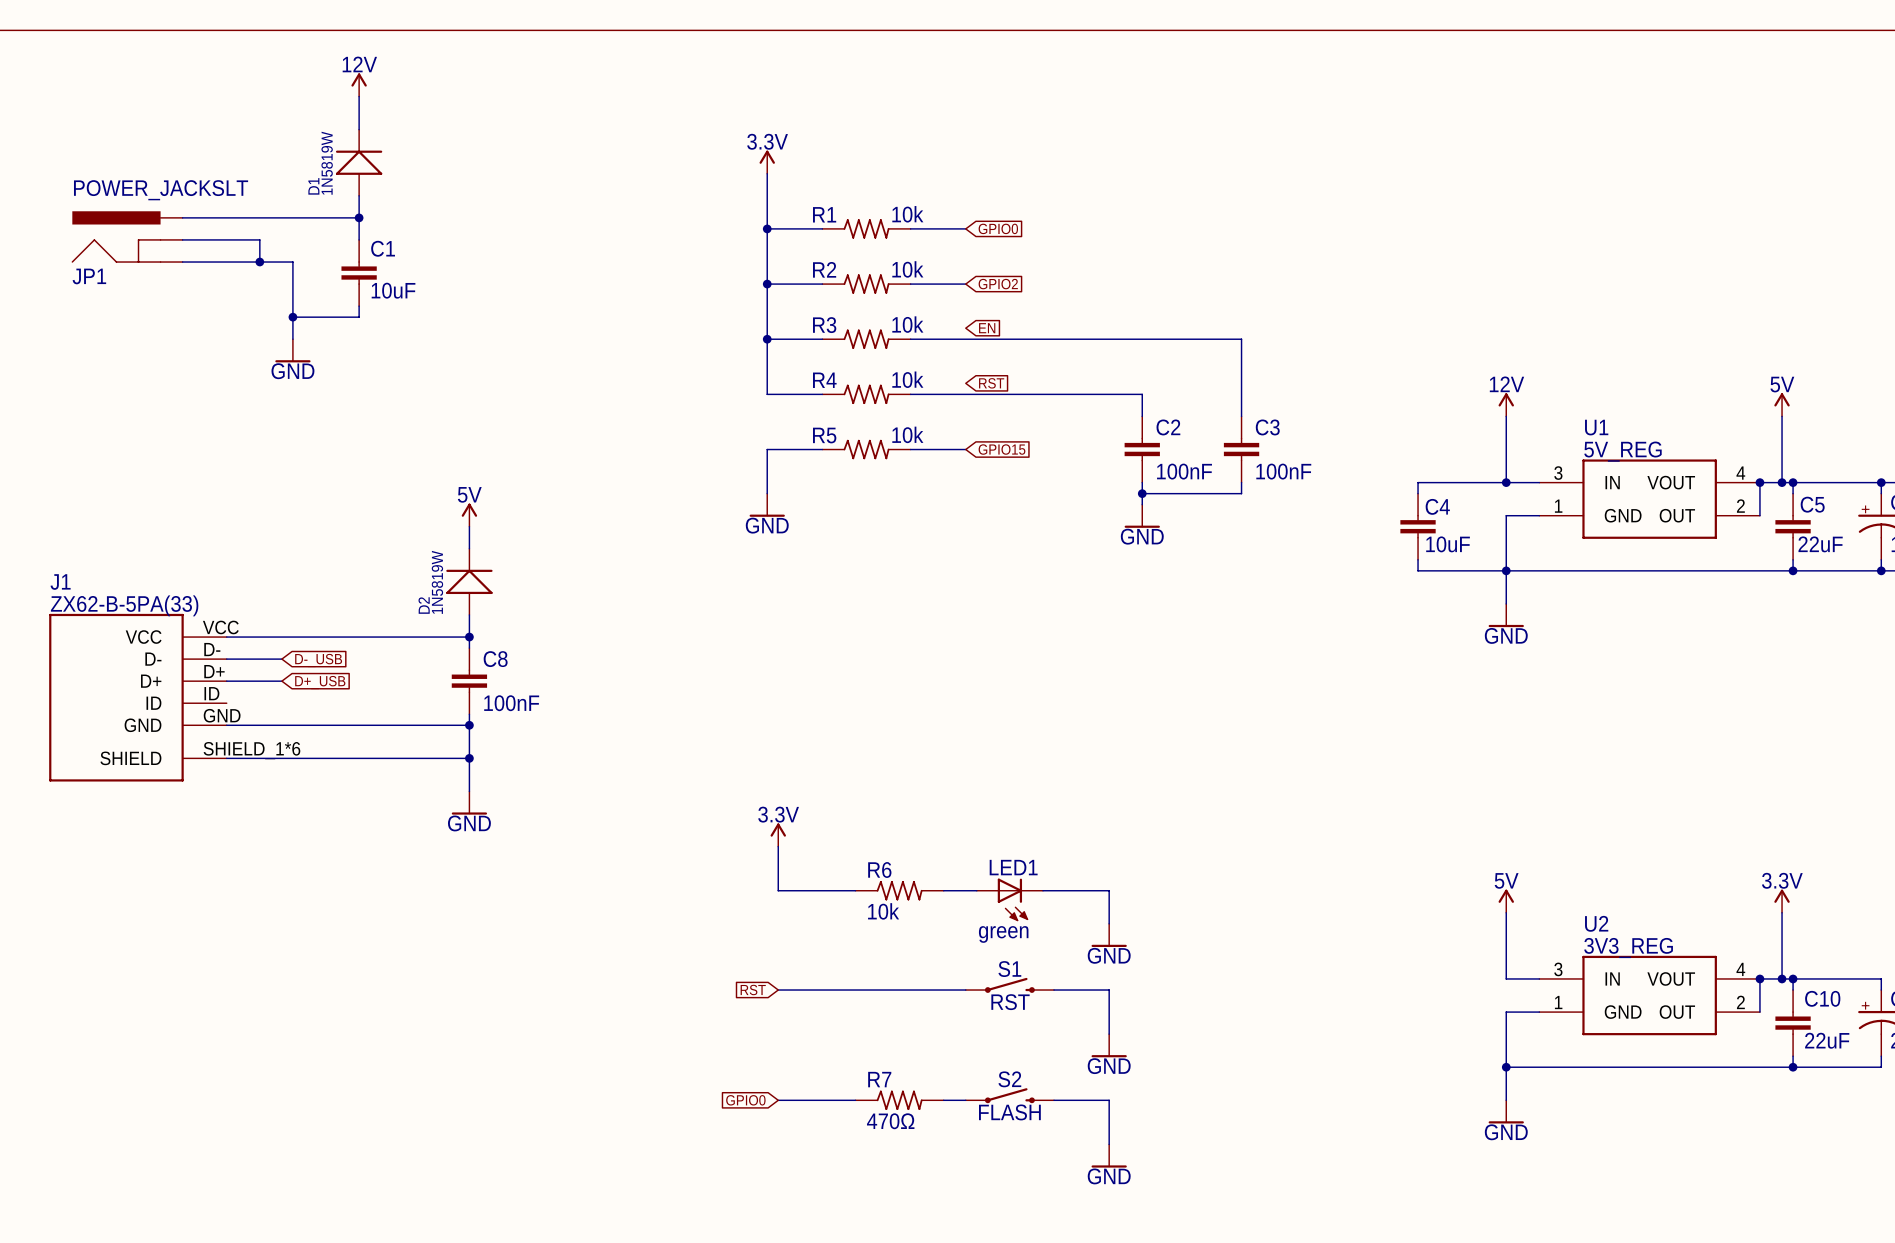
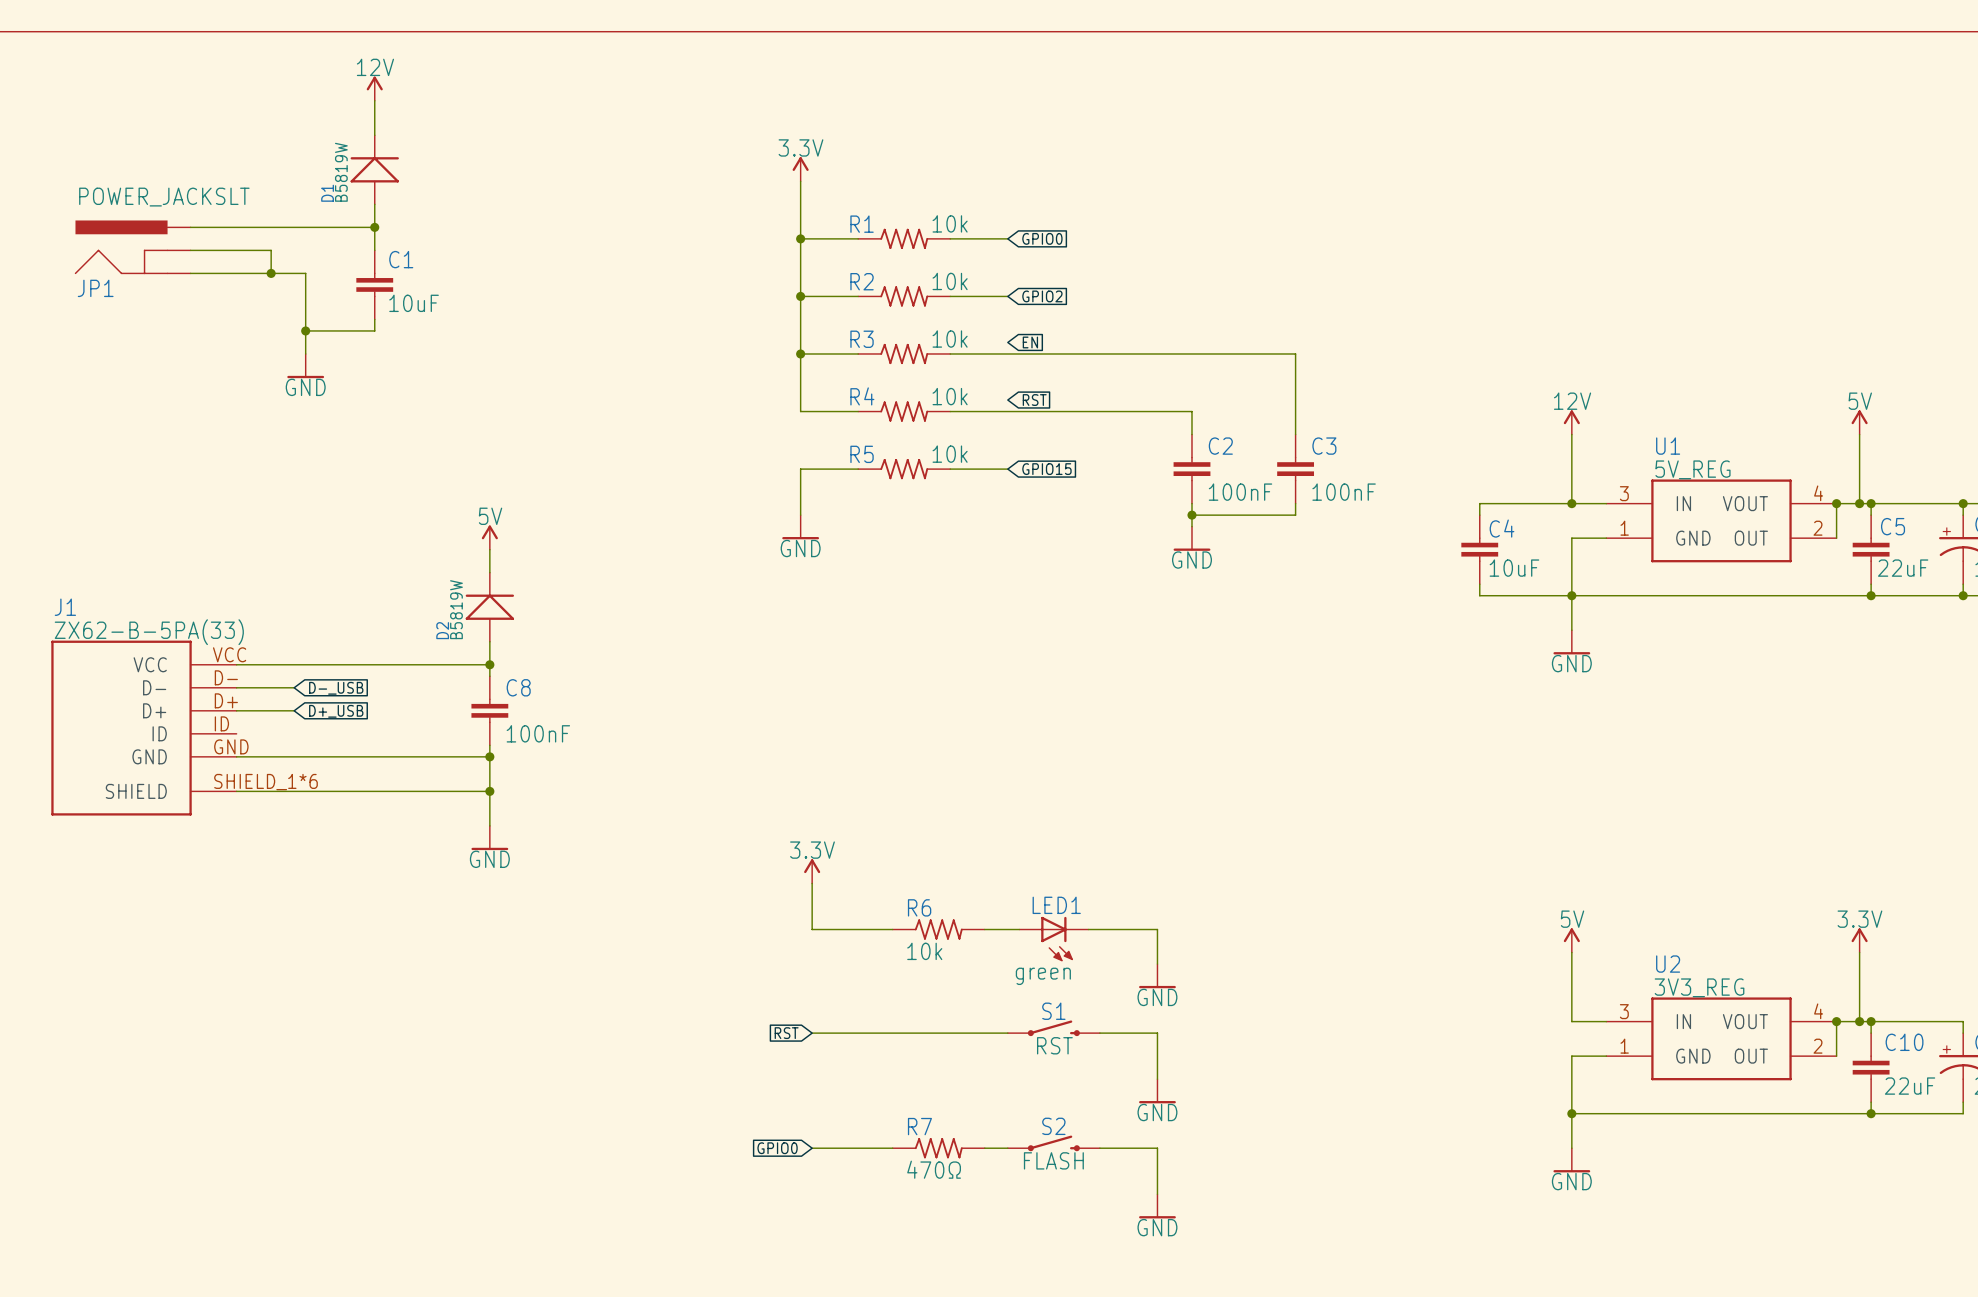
D1 value: 1N5819W (327, 163) -> B5819W (341, 172)
D2 value: 1N5819W (437, 582) -> B5819W (456, 609)

